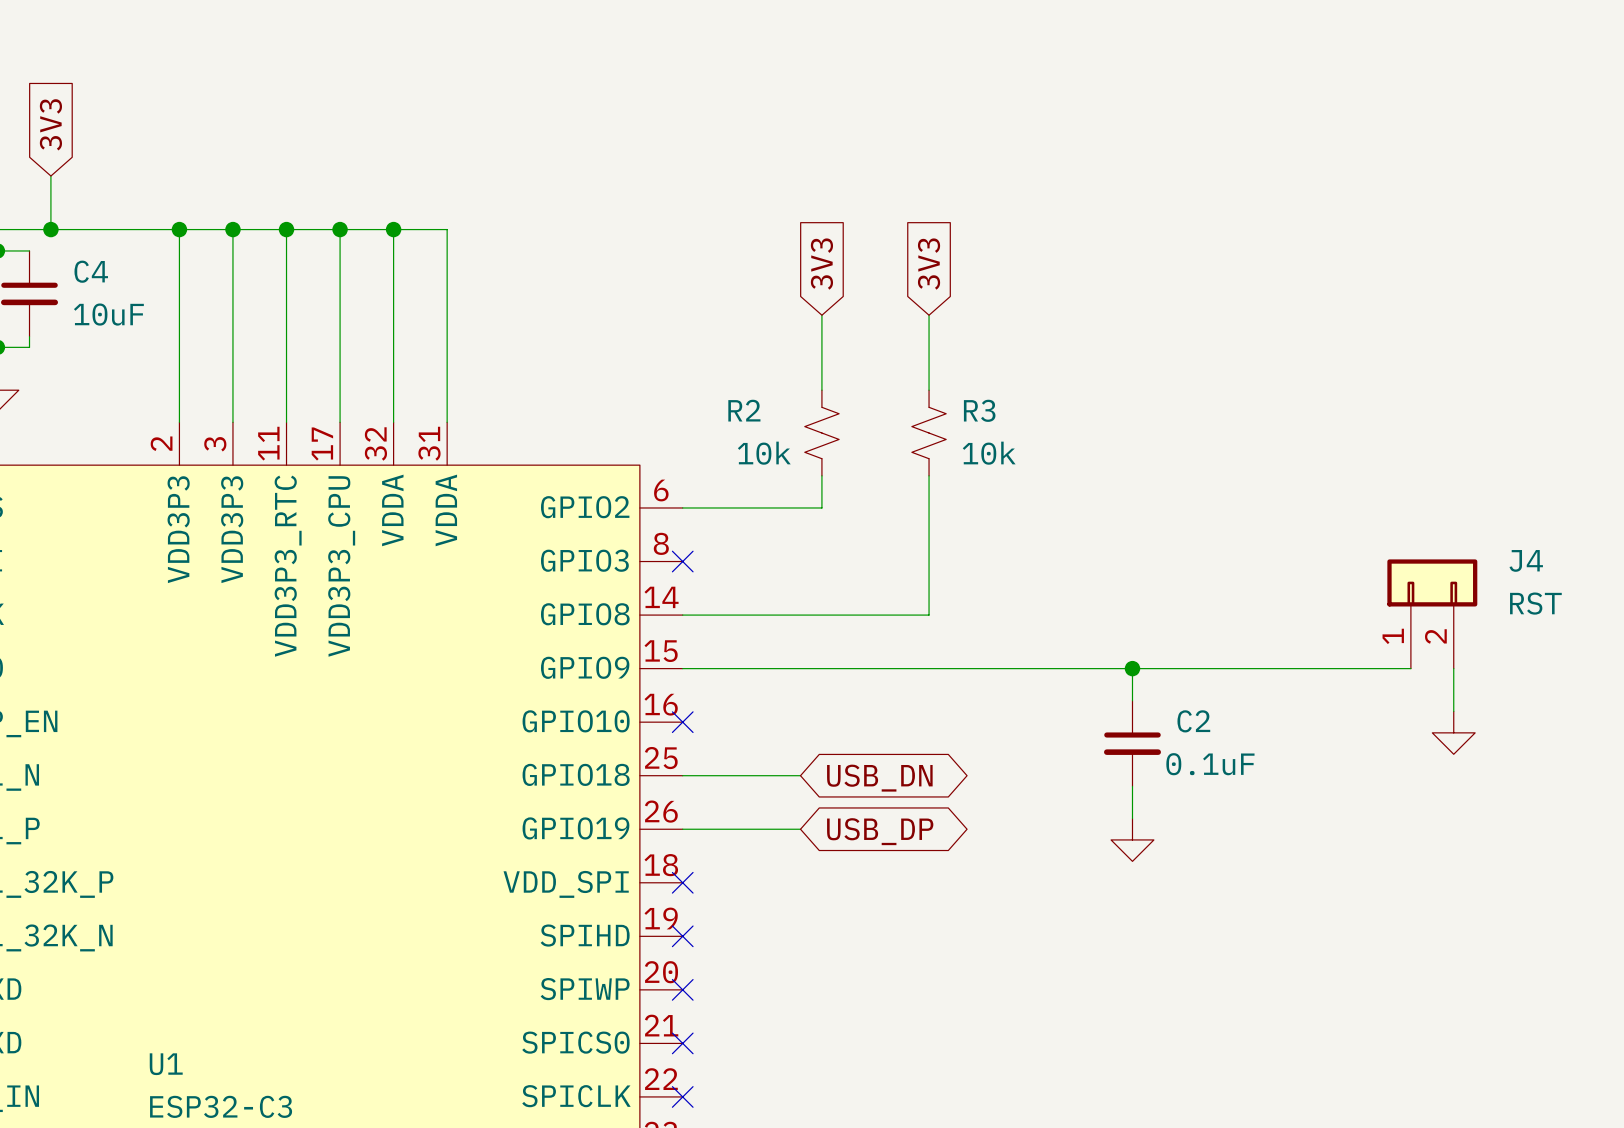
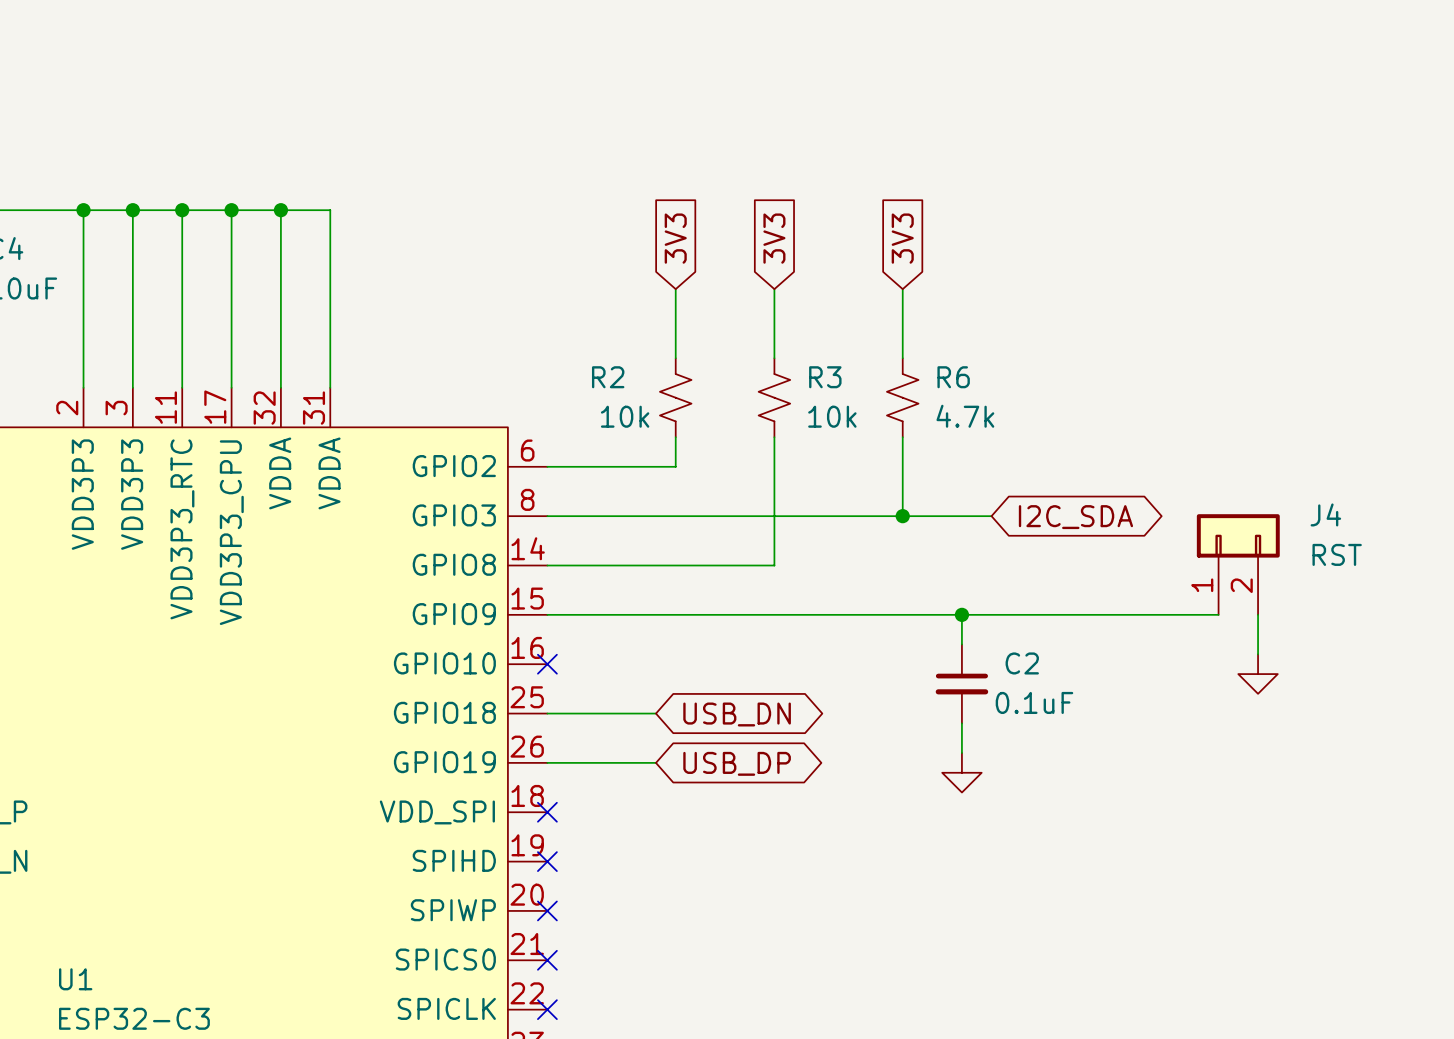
global label: none -> 3V3 (902, 238)
wire: none -> (902, 289) (902, 358)
R6: none -> 4.7k (902, 397)
wire: none -> (902, 437) (902, 516)
wire: none -> (547, 516) (991, 516)
no-connect mark: (682, 561) -> none
junction: none -> (902, 516)
global label: none -> I2C_SDA (1075, 517)

